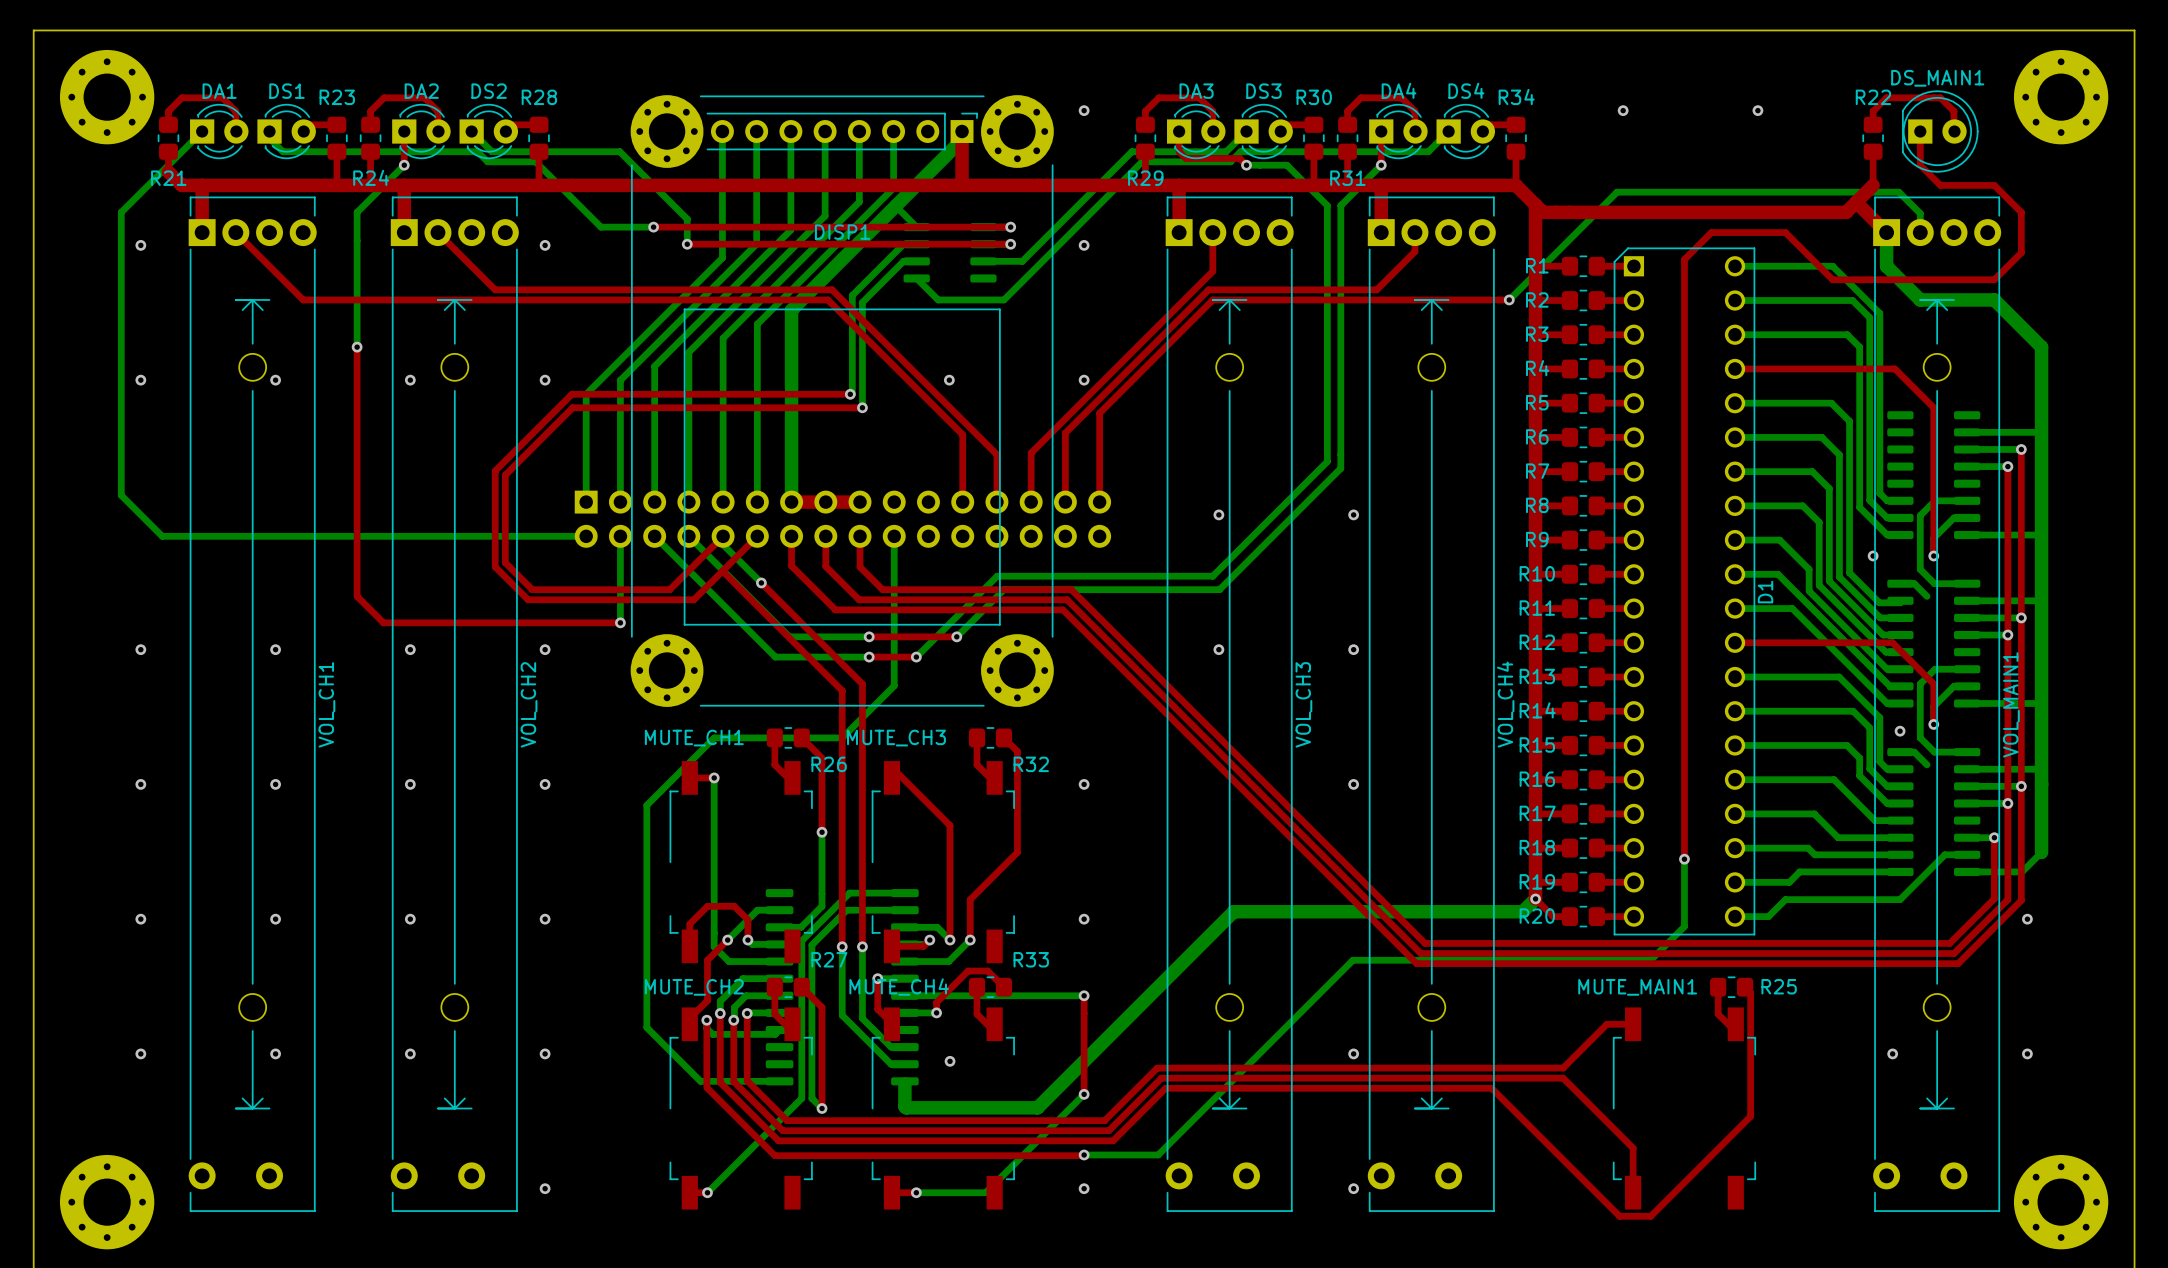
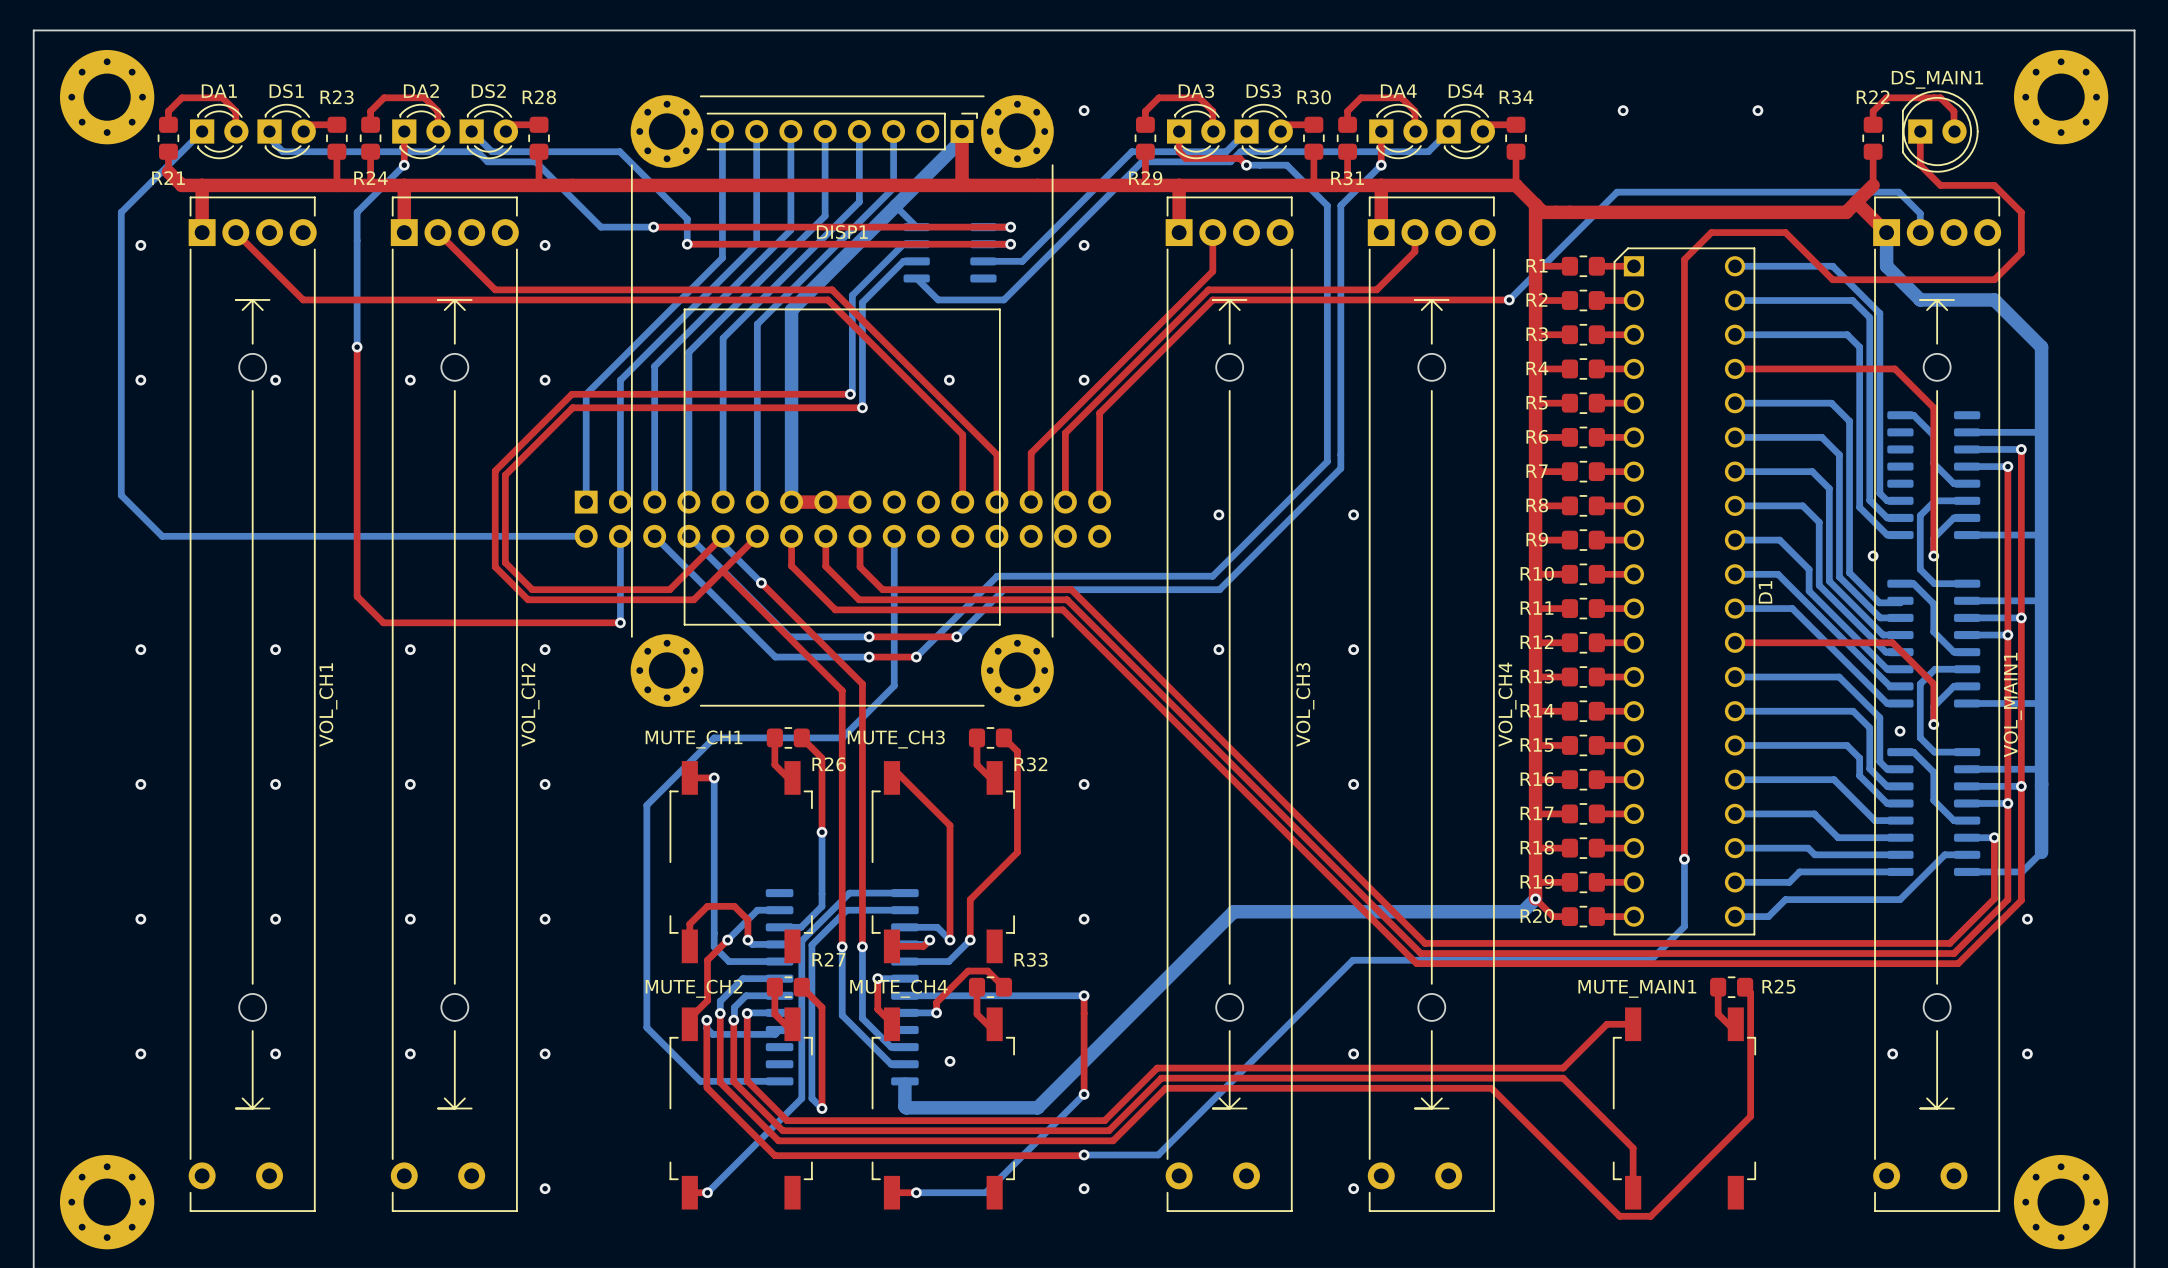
bottom track: none -> (1900, 415) (1913, 415) (1933, 435) (1933, 463) (1953, 483) (1967, 483)
bottom track: (1913, 583) (1927, 596) -> (1913, 583) (1933, 603) (1933, 631) (1953, 652) (1967, 652)
bottom track: (1913, 752) (1927, 764) -> (1913, 752) (1933, 772) (1933, 800) (1953, 820) (1967, 820)

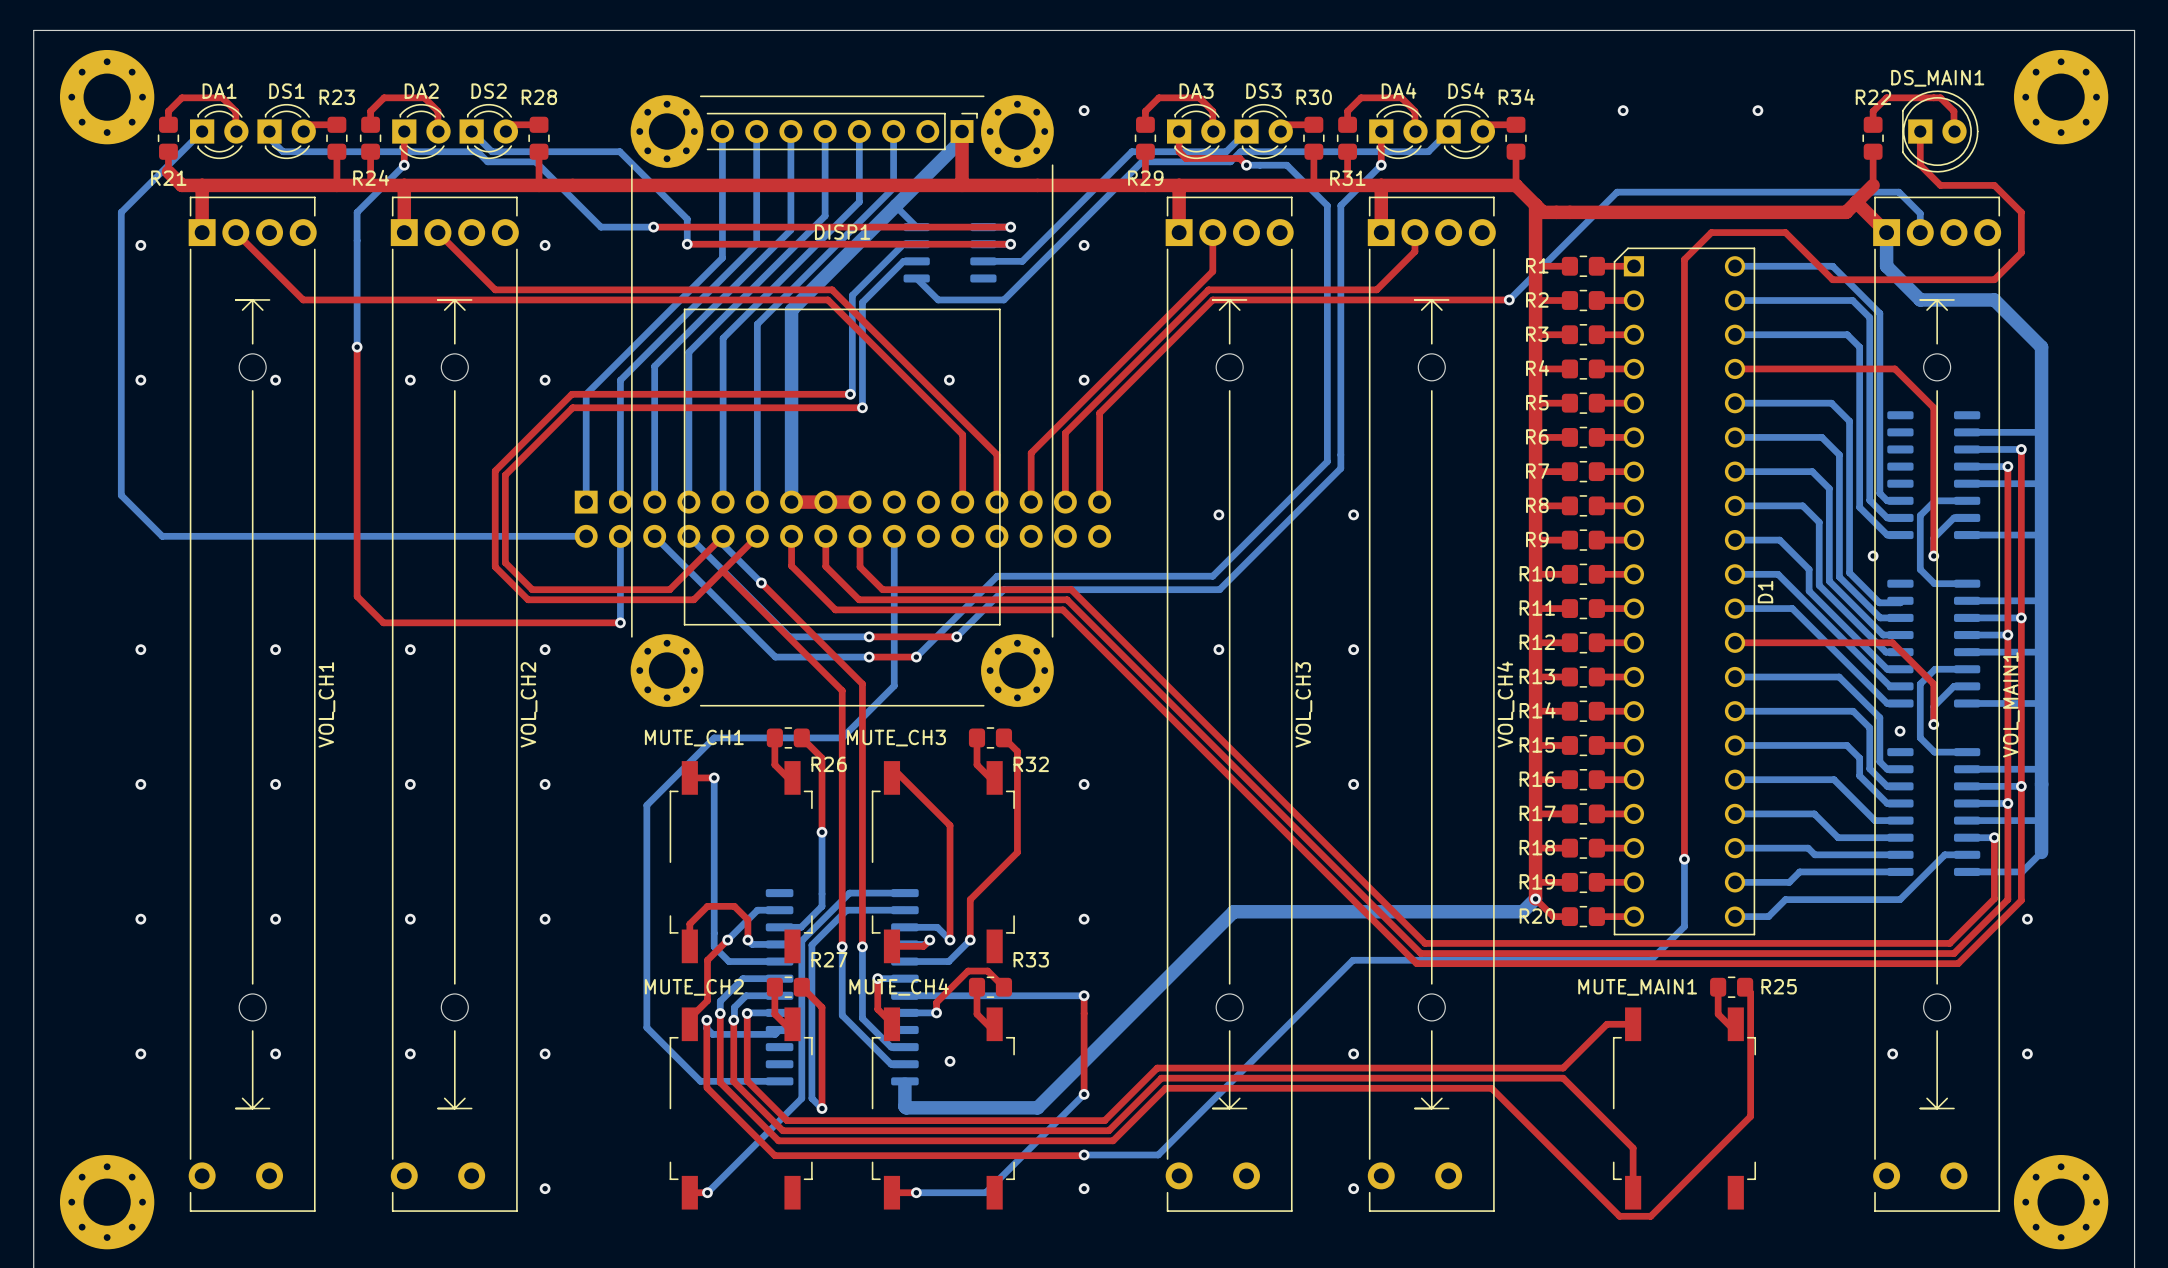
bottom track: (1900, 415) (1913, 415) (1933, 435) (1933, 463) (1953, 483) (1967, 483) -> (2041, 483) (1967, 483)
bottom track: (1900, 583) (1913, 583) (1933, 603) (1933, 631) (1953, 652) (1967, 652) -> (2041, 652) (1967, 652)
bottom track: (1900, 752) (1913, 752) (1933, 772) (1933, 800) (1953, 820) (1967, 820) -> (2041, 820) (1967, 820)

